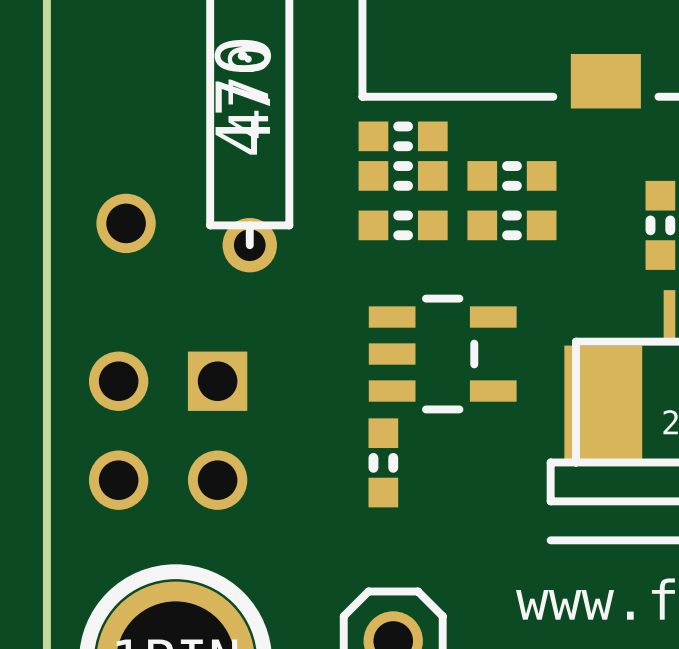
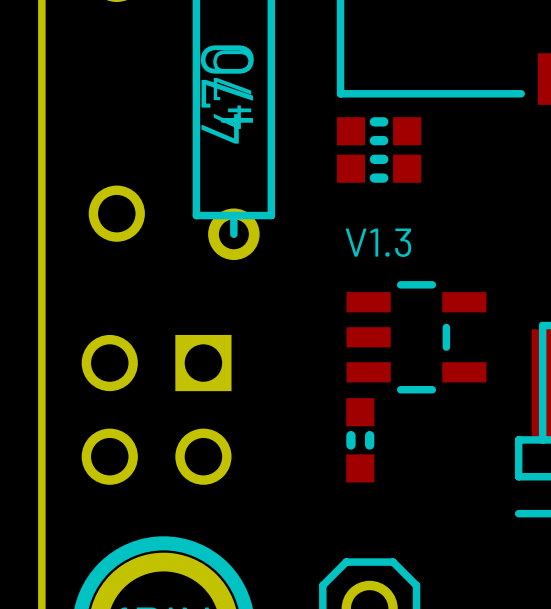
part: (511, 175) -> none
part: (403, 225) -> none
part: (511, 225) -> none
text: none -> V1.3 (378, 242)

